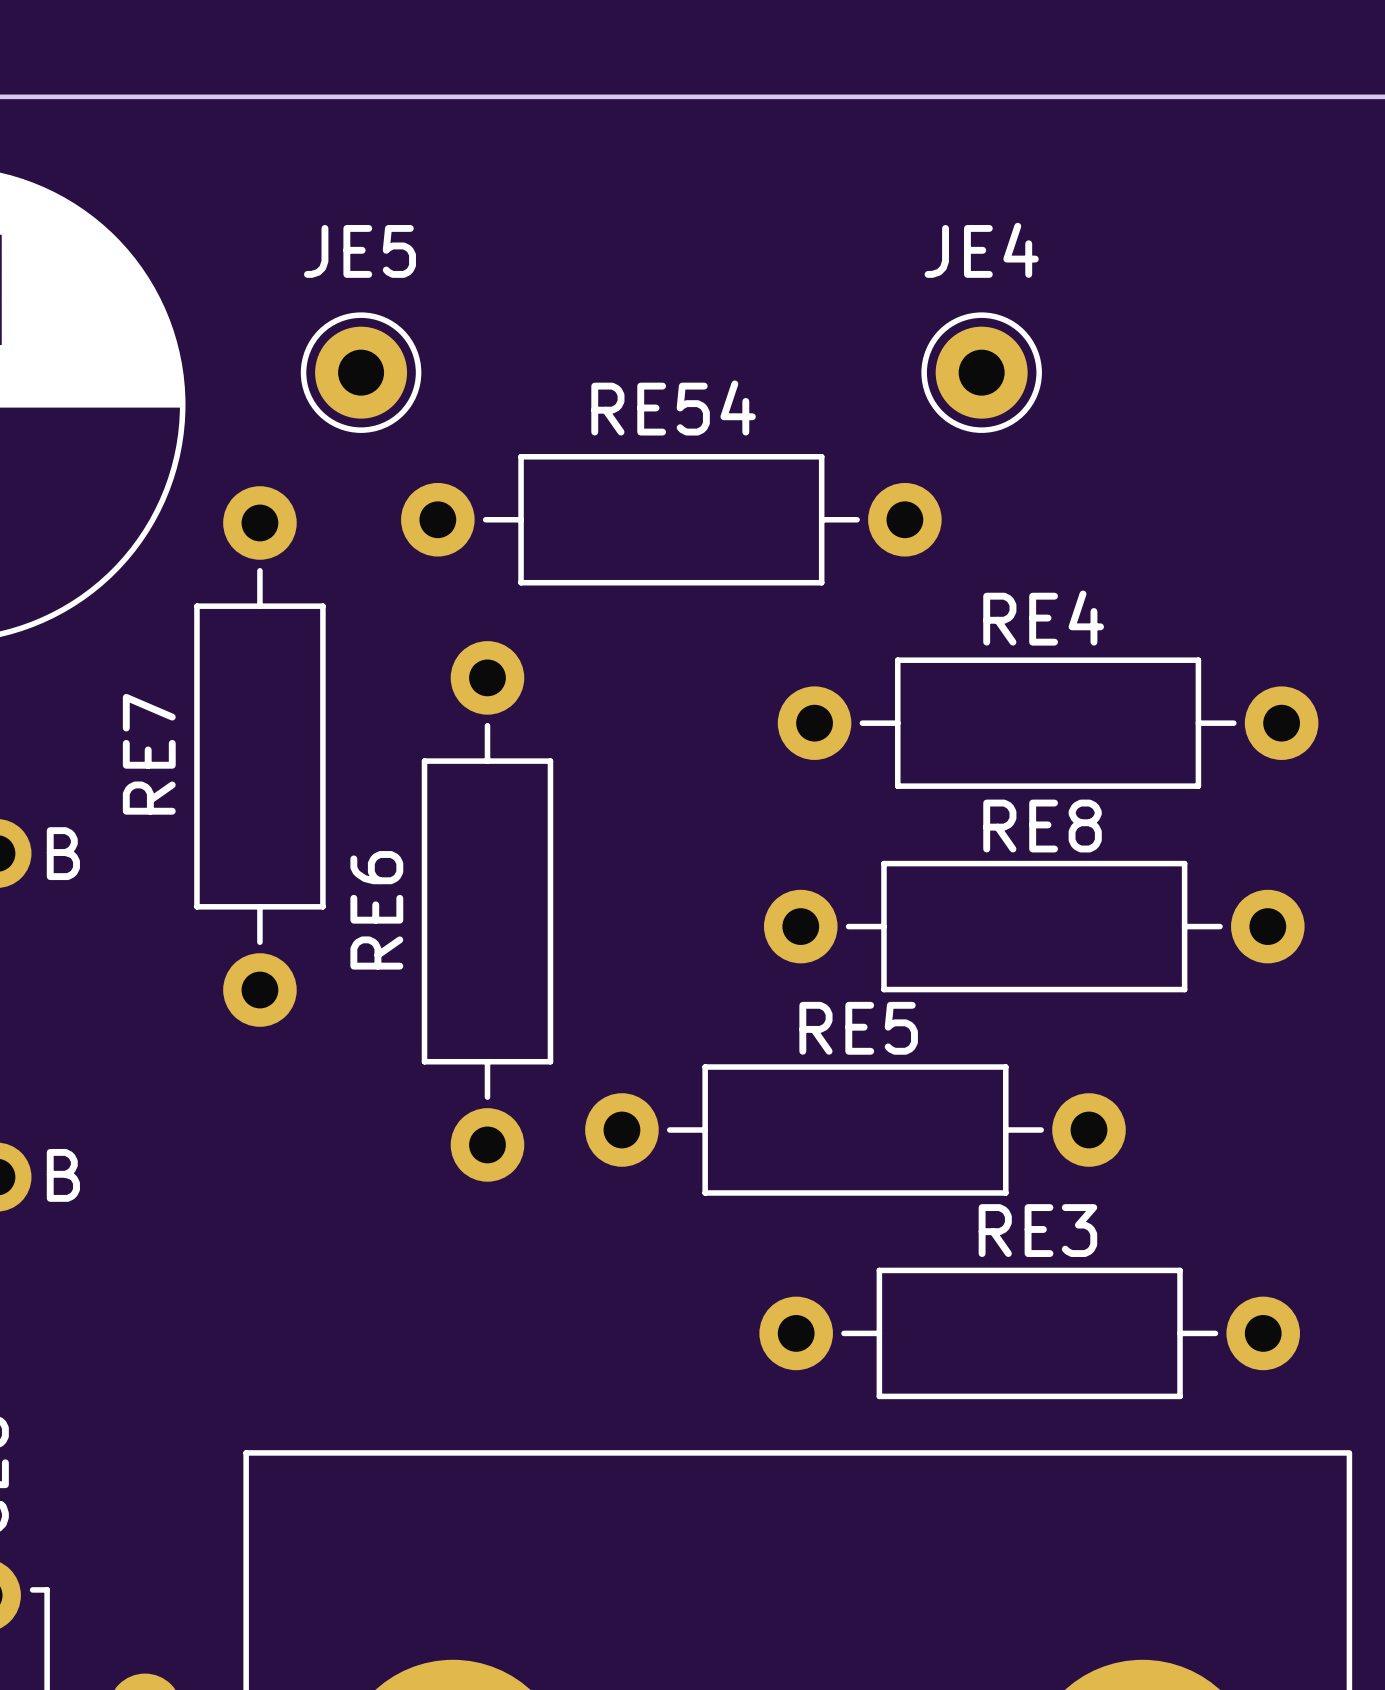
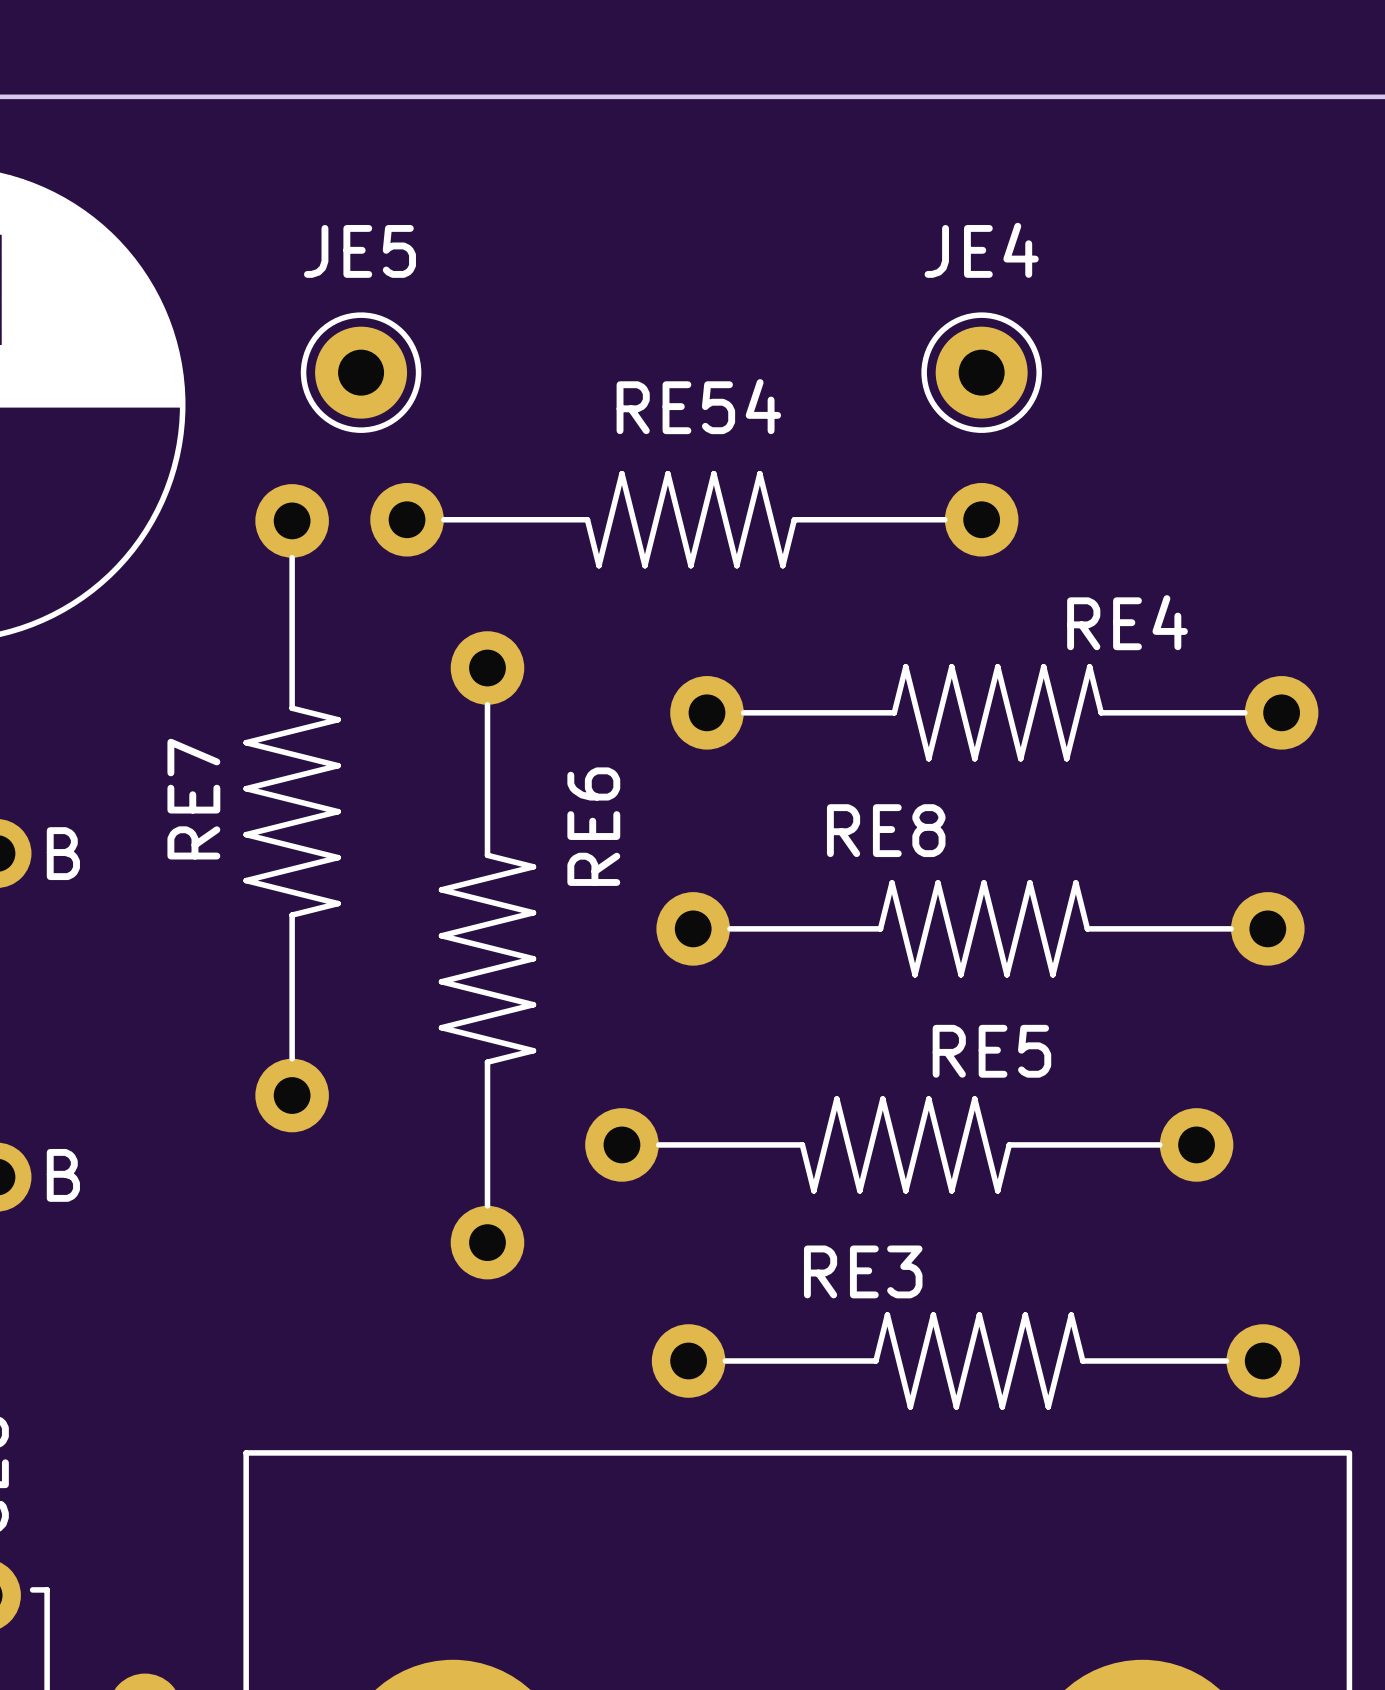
RE54 footprint: [401, 454, 942, 586] -> [370, 471, 1019, 569]
RE7 footprint: [194, 486, 326, 1027] -> [243, 484, 341, 1133]
RE4 name position: RE4 (1043, 618) -> RE4 (1127, 622)
RE6 footprint: [421, 641, 554, 1182] -> [438, 631, 537, 1280]
RE4 footprint: [777, 657, 1319, 789] -> [670, 664, 1319, 762]
RE8 name position: RE8 (1042, 826) -> RE8 (886, 830)
RE8 footprint: [763, 860, 1305, 993] -> [656, 880, 1305, 978]
RE6 name position: RE6 (376, 910) -> RE6 (593, 826)
RE5 footprint: [585, 1064, 1126, 1196] -> [585, 1096, 1234, 1194]
RE3 name position: RE3 (1037, 1230) -> RE3 (863, 1271)
RE3 footprint: [759, 1267, 1301, 1400] -> [651, 1312, 1301, 1410]

